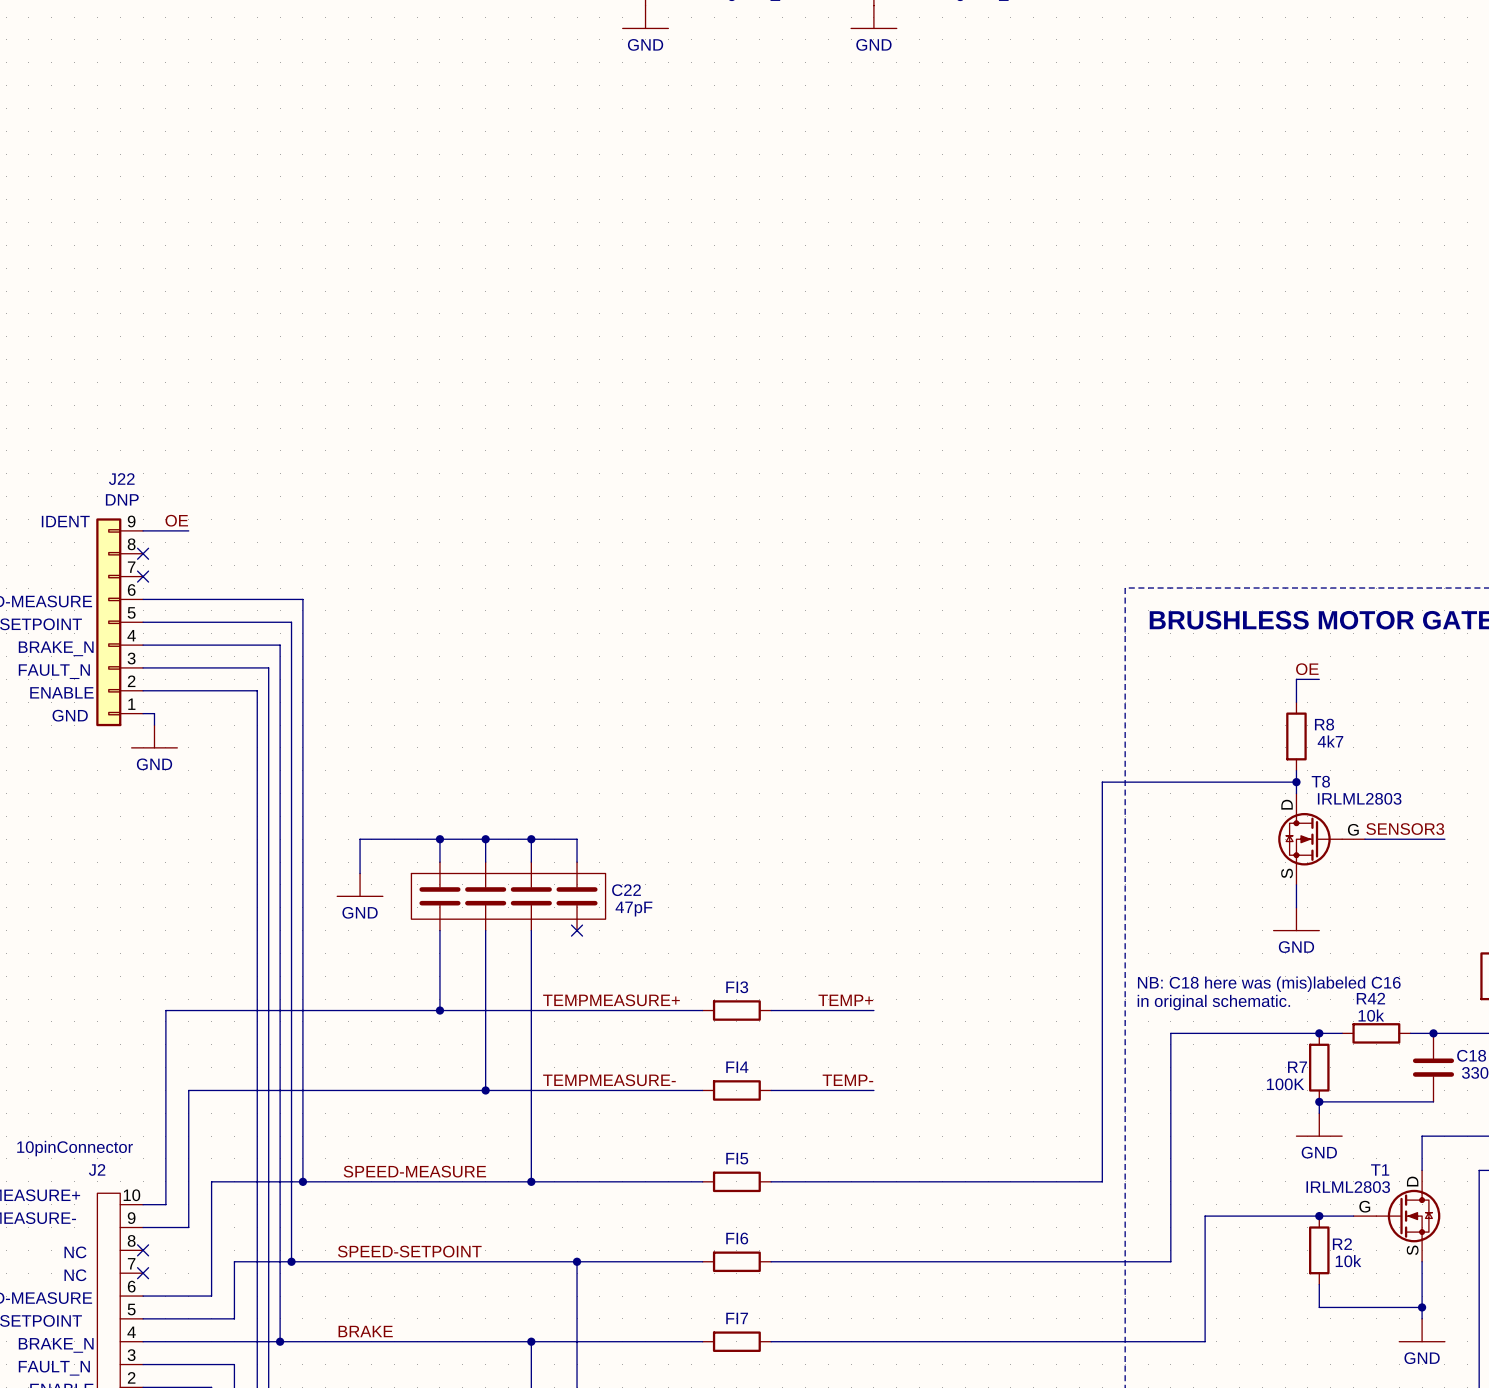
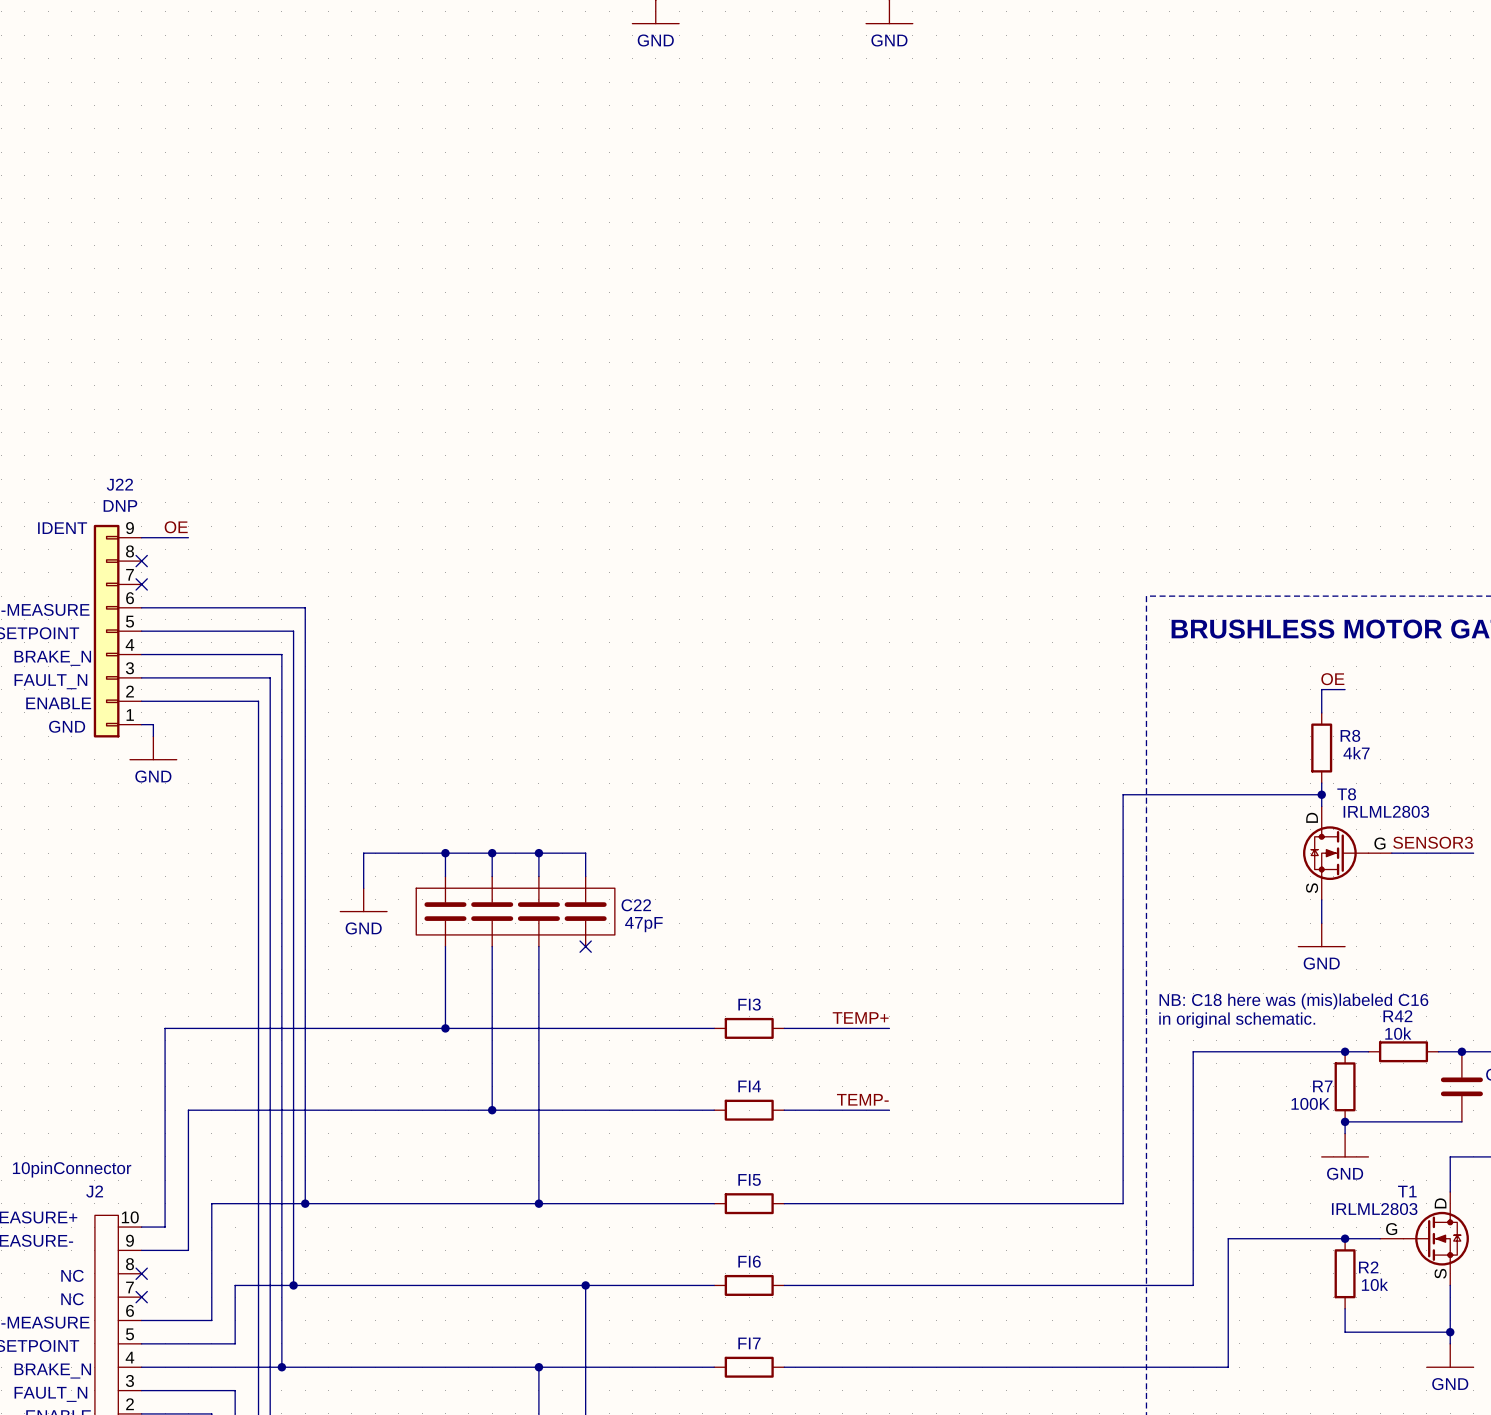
label: TEMPMEASURE+ (611, 1000) -> none
label: TEMPMEASURE- (609, 1080) -> none
label: SPEED-MEASURE (414, 1171) -> none
label: SPEED-SETPOINT (409, 1251) -> none
label: BRAKE (365, 1331) -> none

